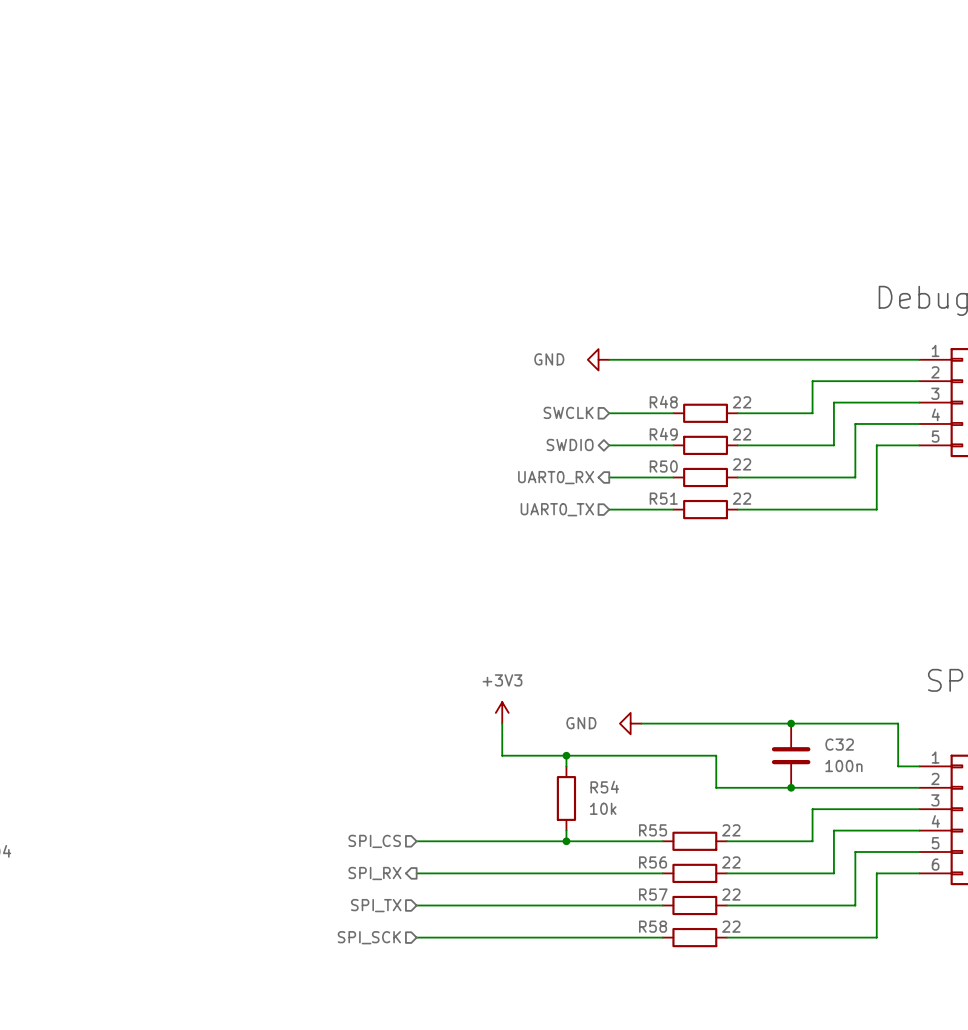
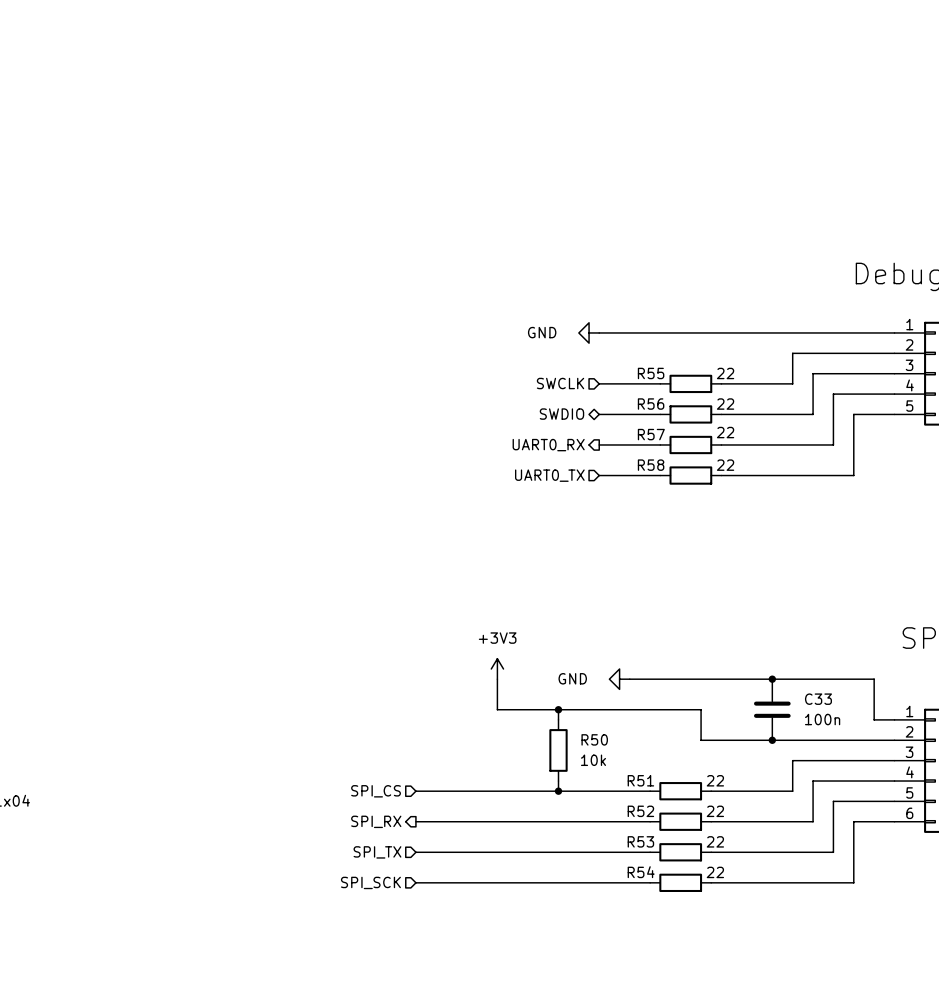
R48 name: R48 (663, 402) -> R55 (651, 373)
R49 name: R49 (663, 434) -> R56 (651, 404)
R50 name: R50 (663, 466) -> R57 (651, 434)
R51 name: R51 (663, 498) -> R58 (651, 465)
C32 name: C32 (839, 744) -> C33 (818, 699)
R54 name: R54 (604, 787) -> R50 (594, 739)
R55 name: R55 (653, 830) -> R51 (640, 780)
R56 name: R56 (653, 862) -> R52 (640, 811)
R57 name: R57 (653, 894) -> R53 (640, 841)
R58 name: R58 (653, 926) -> R54 (641, 872)

